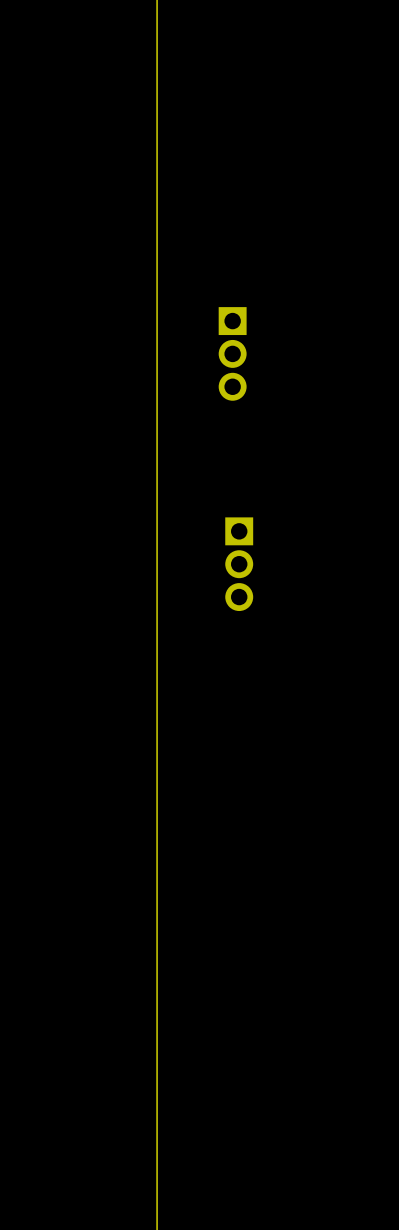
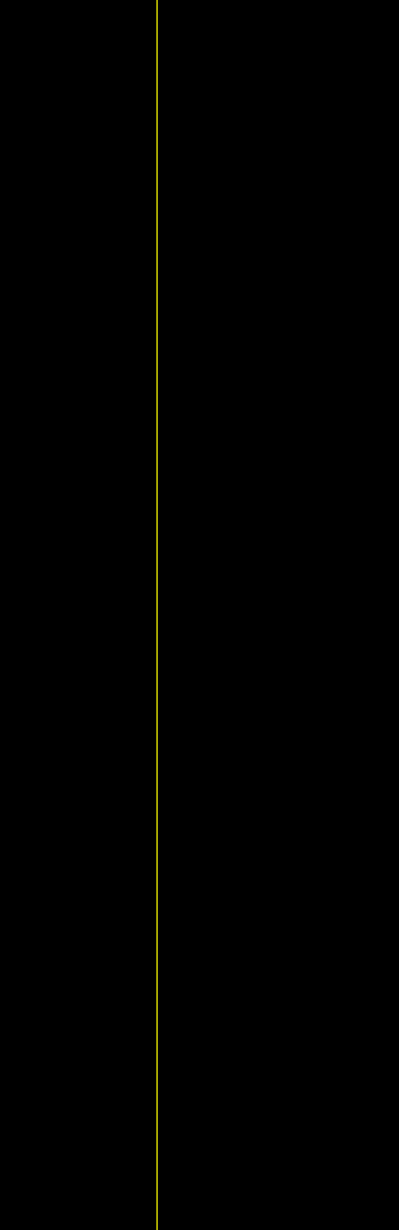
part: (232, 353) -> none
part: (239, 564) -> none

